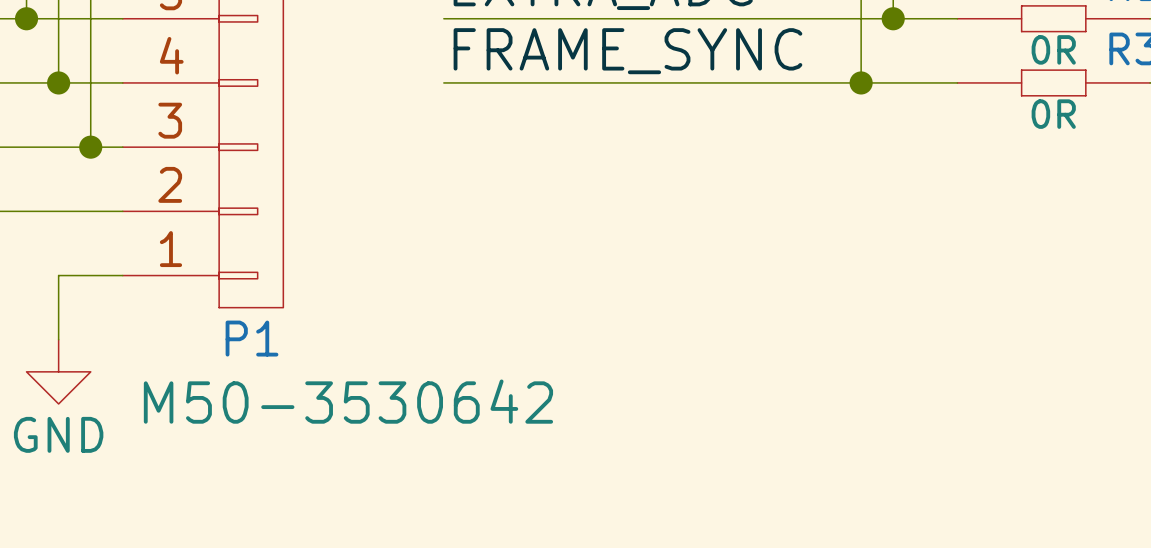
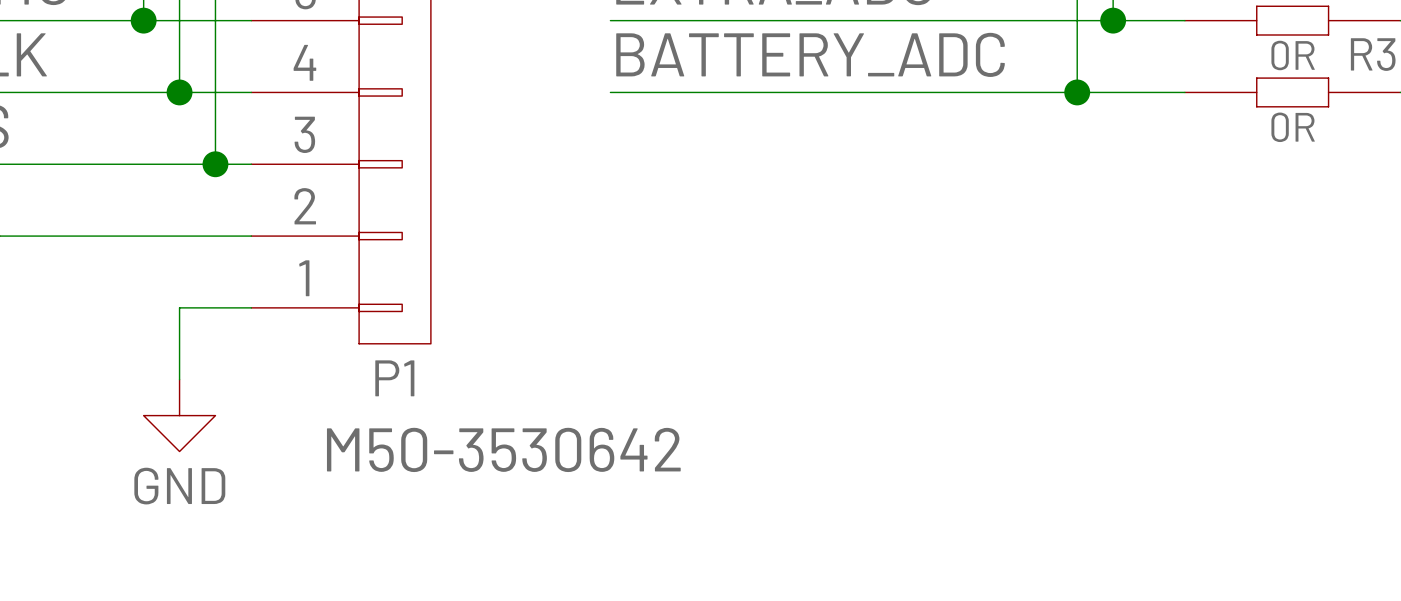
label: FRAME_SYNC (627, 51) -> BATTERY_ADC (810, 54)

